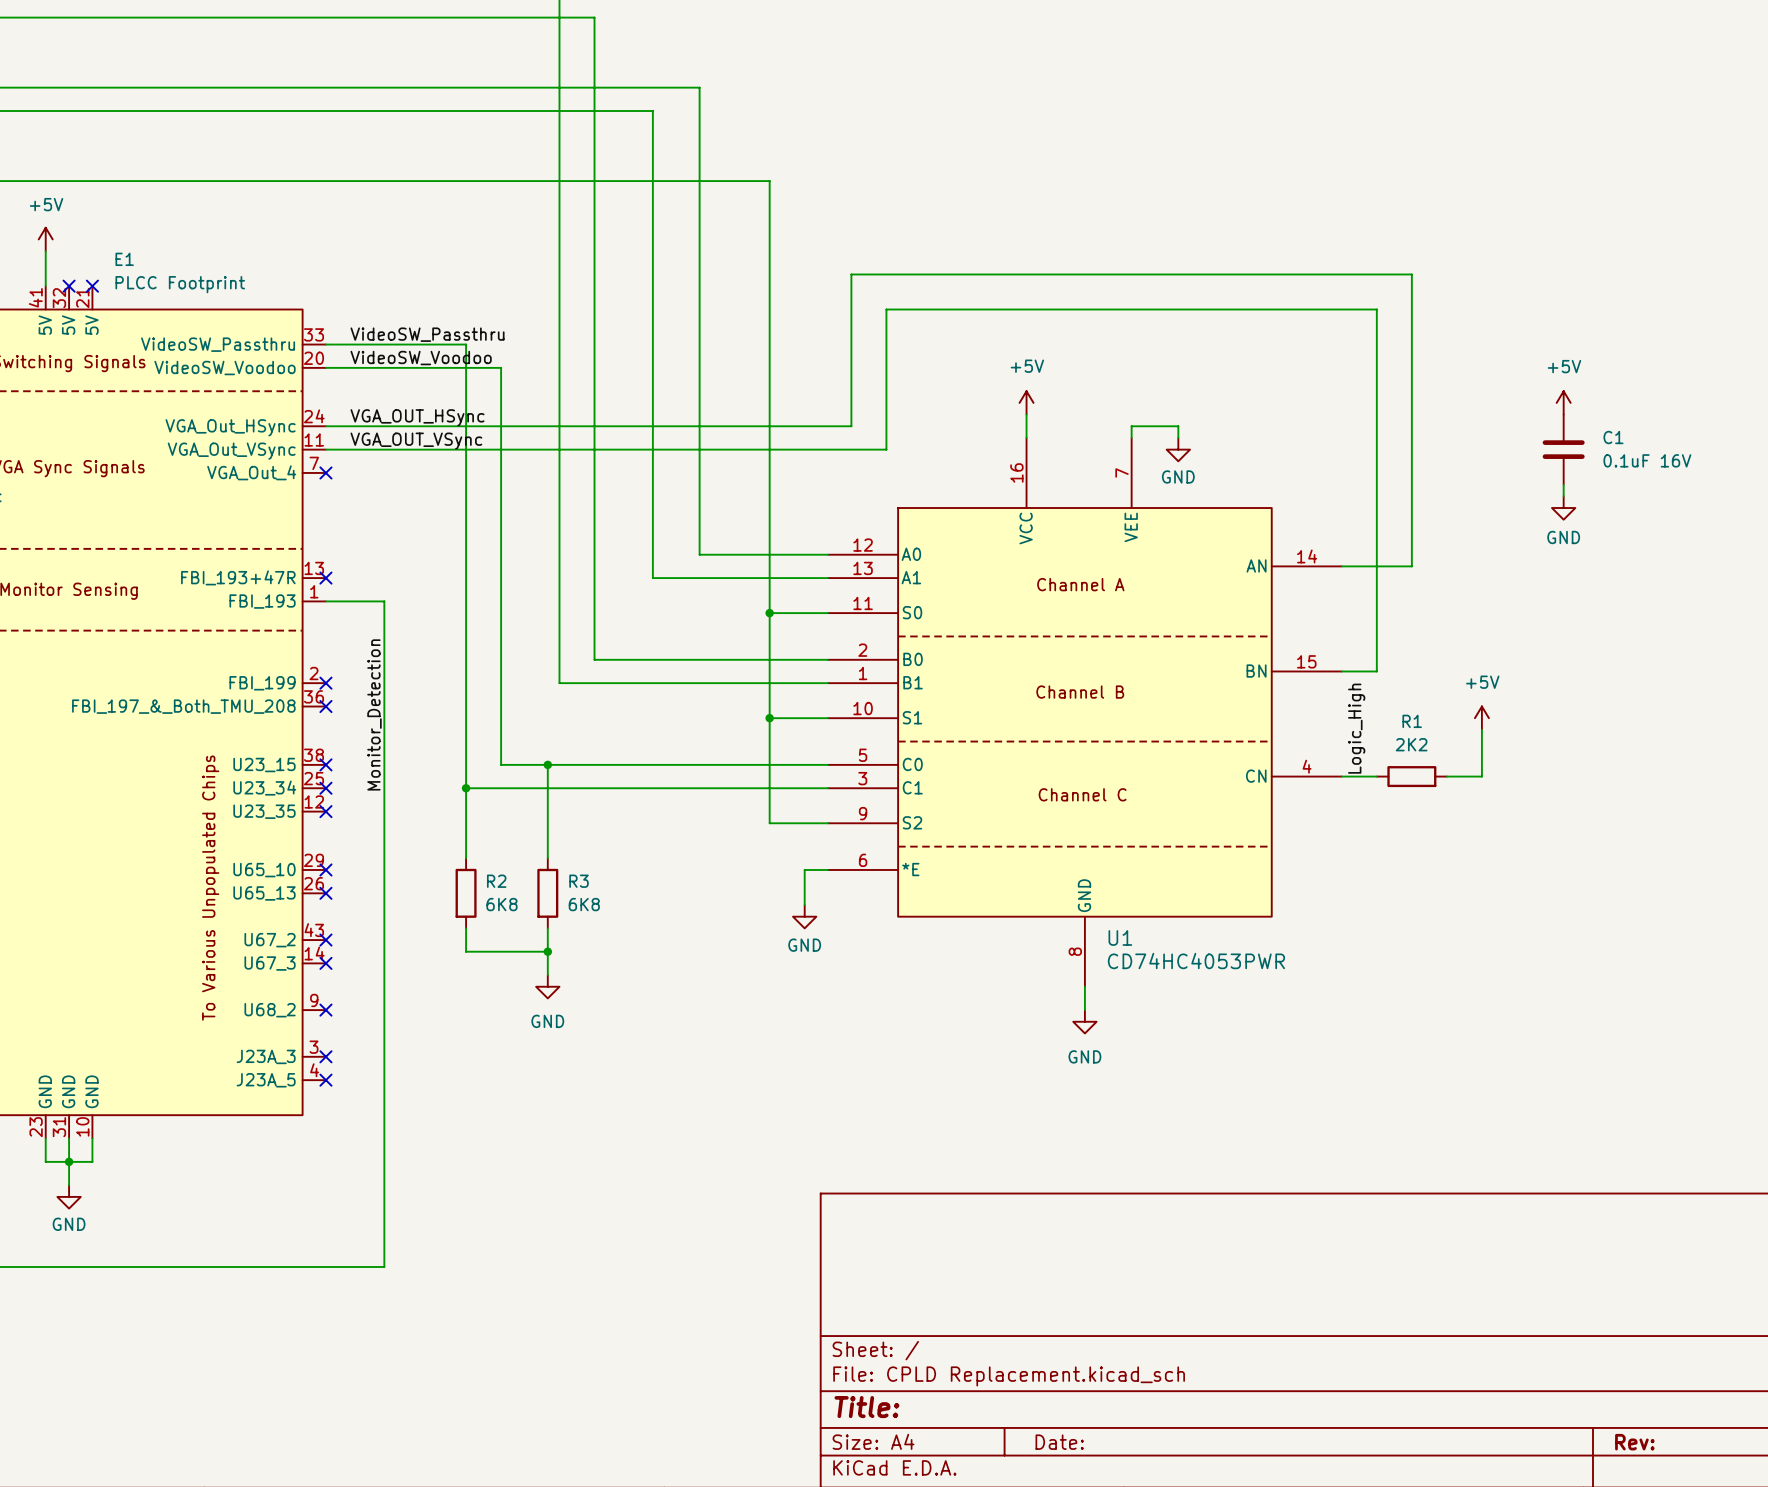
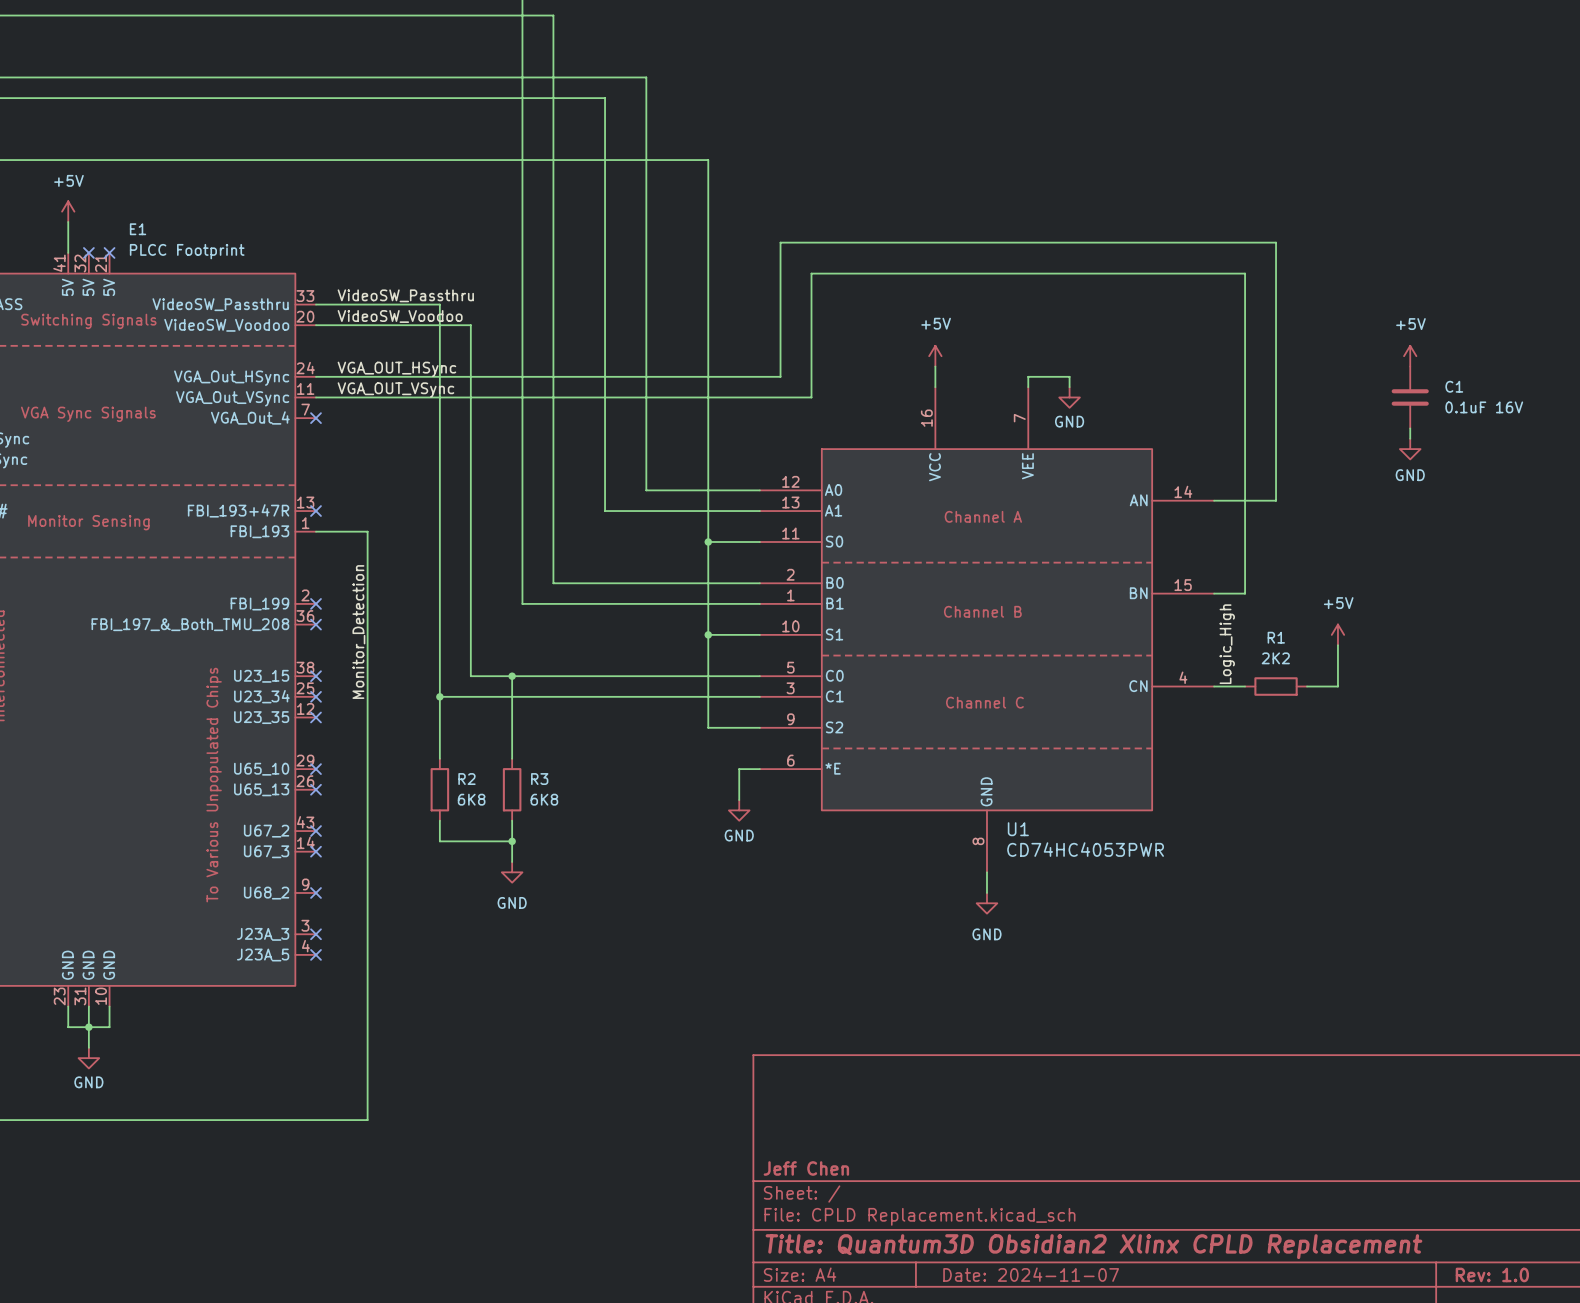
title block: none -> Jeff Chen (806, 1168)
title block: Title: (866, 1407) -> Title: Quantum3D Obsidian2 Xlinx CPLD Replacement (1093, 1246)
title block: Date: (1059, 1442) -> Date: 2024-11-07 (1031, 1274)
title block: Rev: (1634, 1442) -> Rev: 1.0 (1492, 1274)

